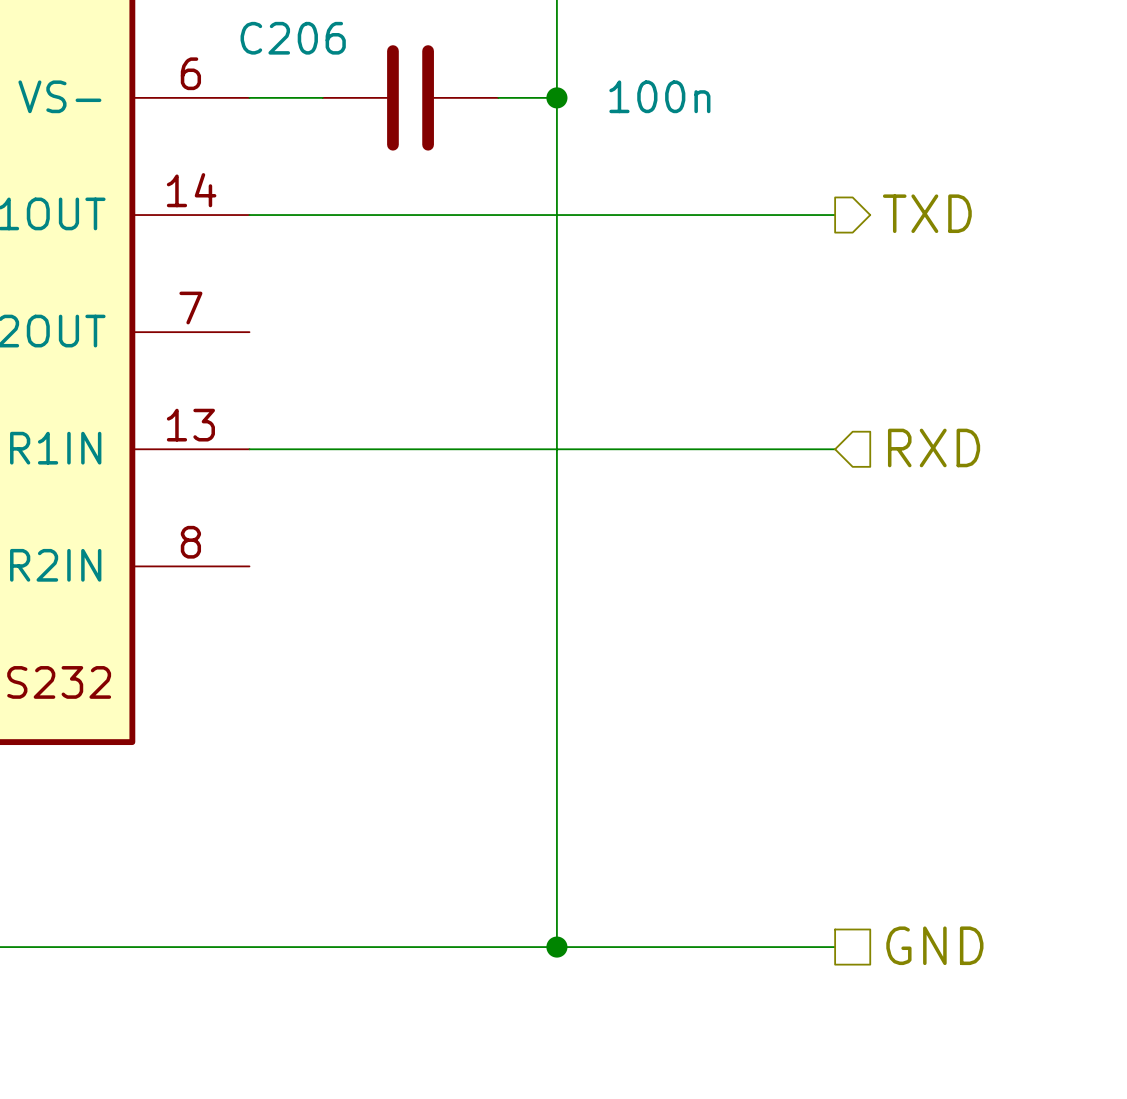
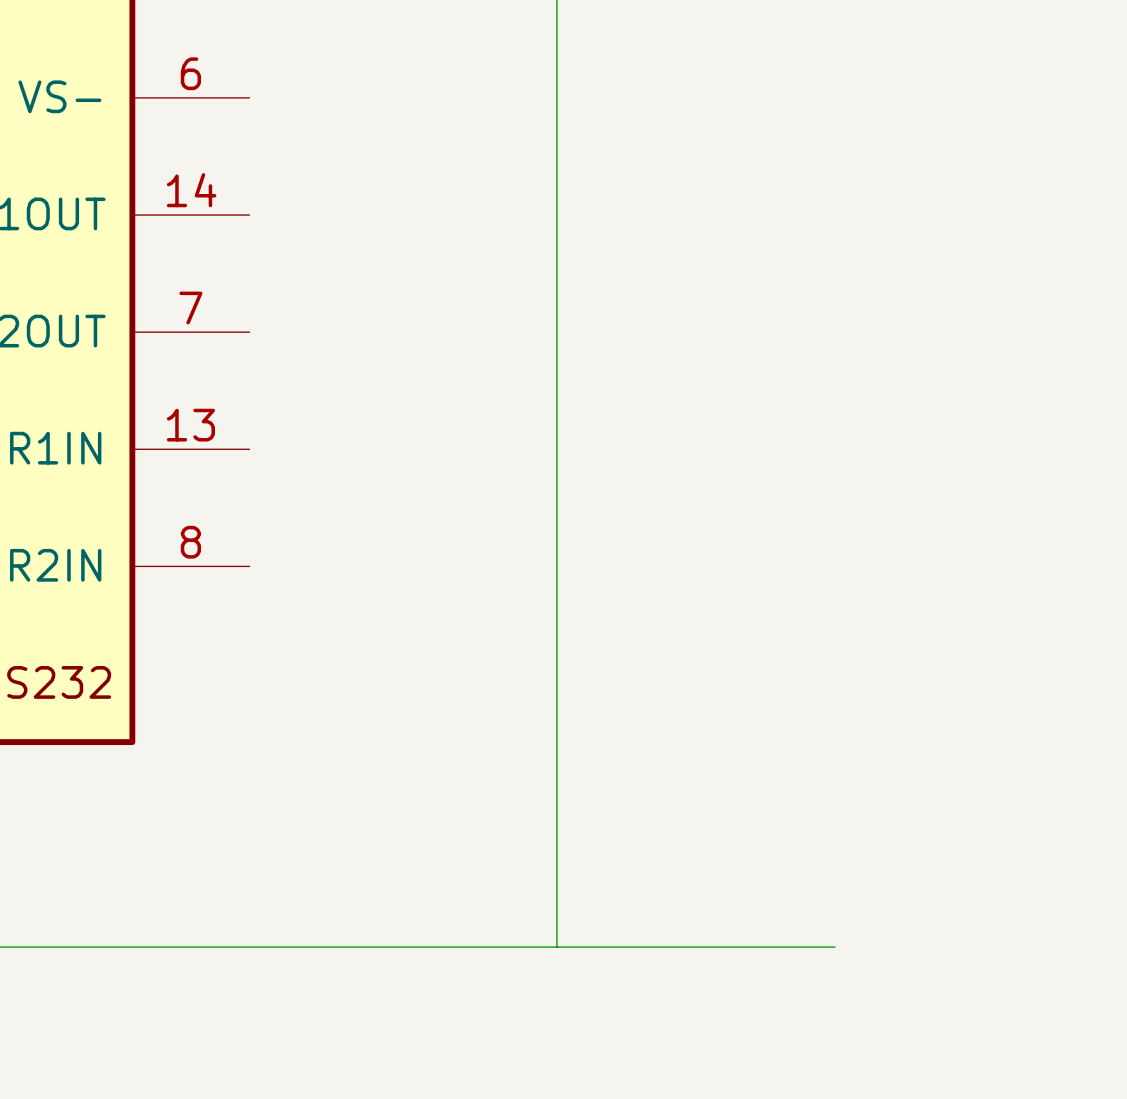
wire: (249, 97) (322, 97) -> none
C206: 100n (410, 97) -> none
wire: (498, 97) (556, 97) -> none
junction: (556, 97) -> none
hierarchical label: TXD (927, 213) -> none
wire: (249, 215) (835, 215) -> none
hierarchical label: RXD (934, 447) -> none
wire: (249, 449) (835, 449) -> none
hierarchical label: GND (934, 945) -> none
junction: (556, 947) -> none

